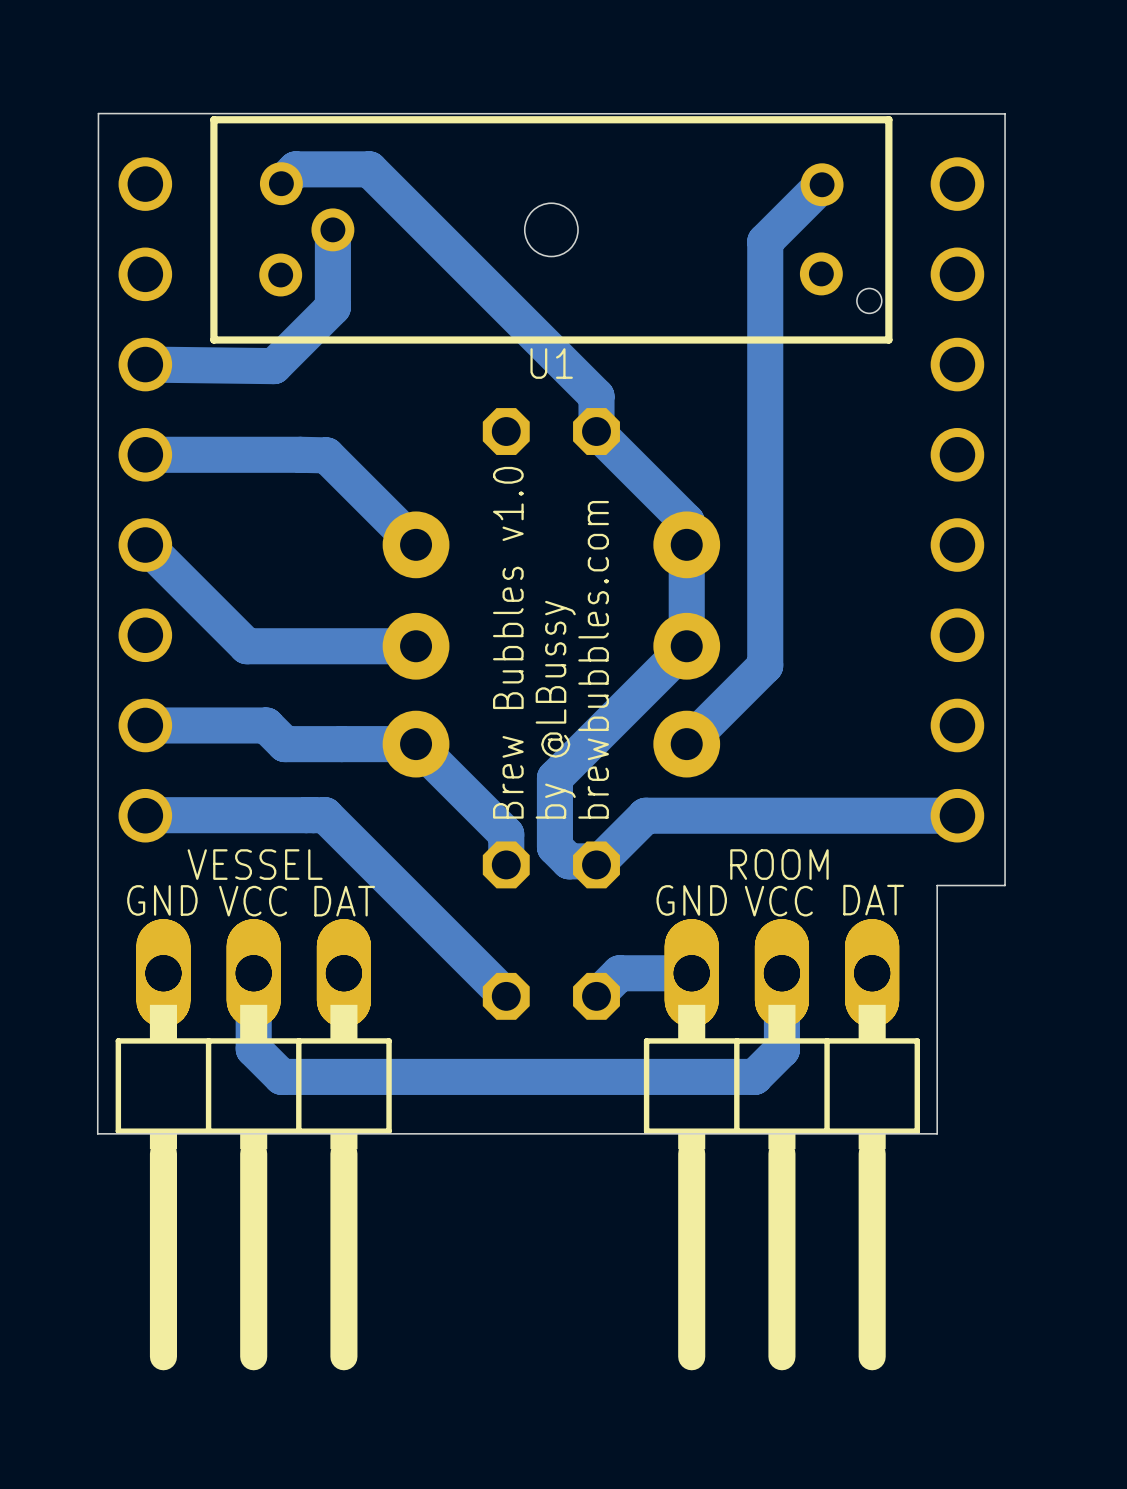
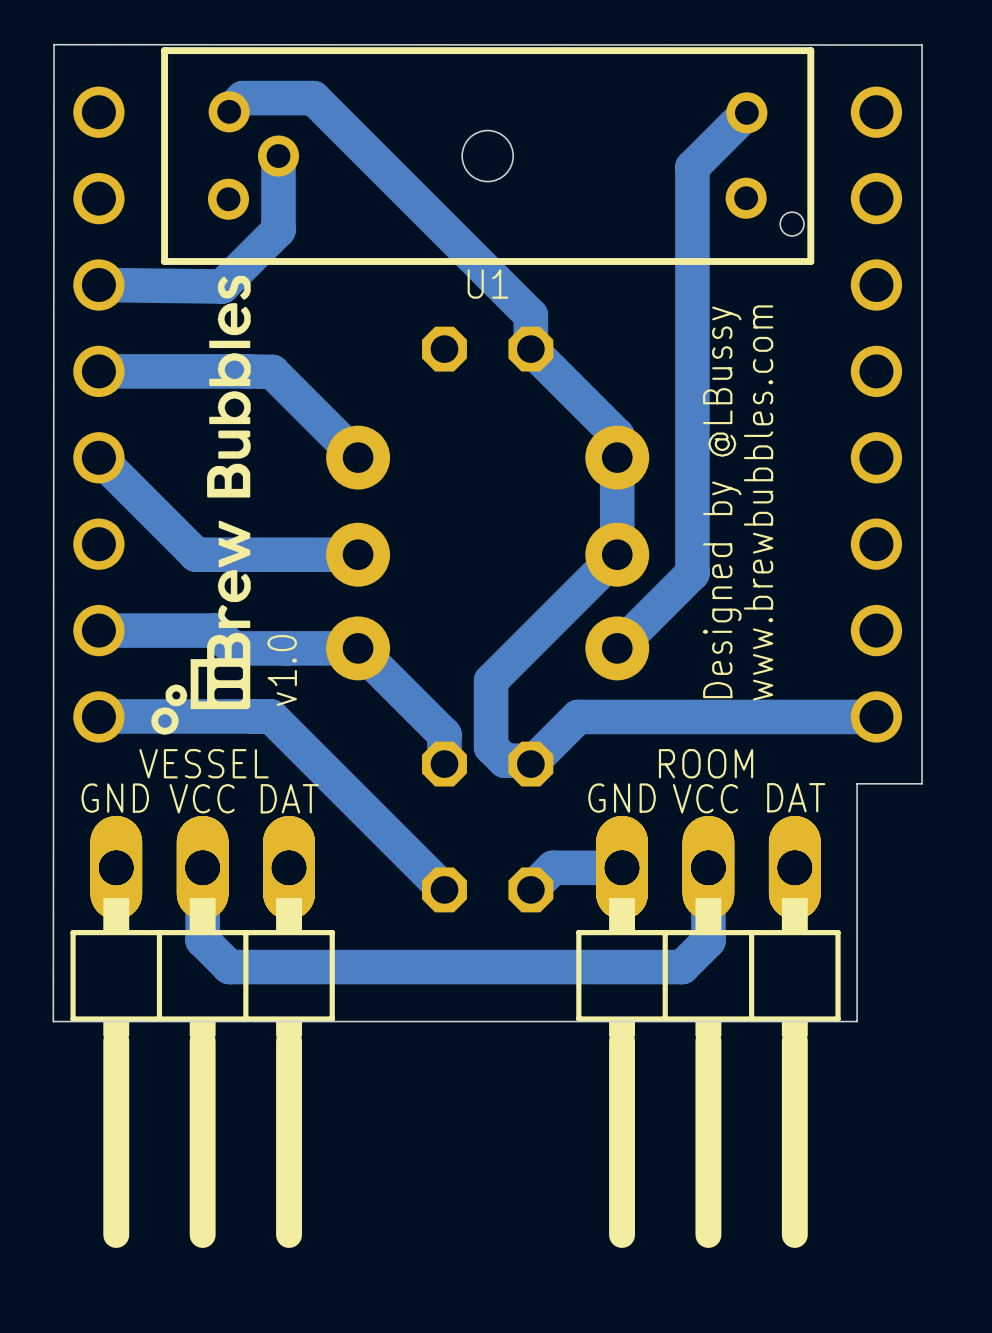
drawing: none -> [151, 275, 251, 735]
text: none -> Designed by @LBussy (722, 502)
text: none -> www.brewbubbles.com (758, 502)
text: Brew Bubbles v1.0 (508, 642) -> none
text: brewbubbles.com (593, 659) -> none
text: by @LBussy (555, 709) -> none
text: none -> v1.0 (282, 670)

